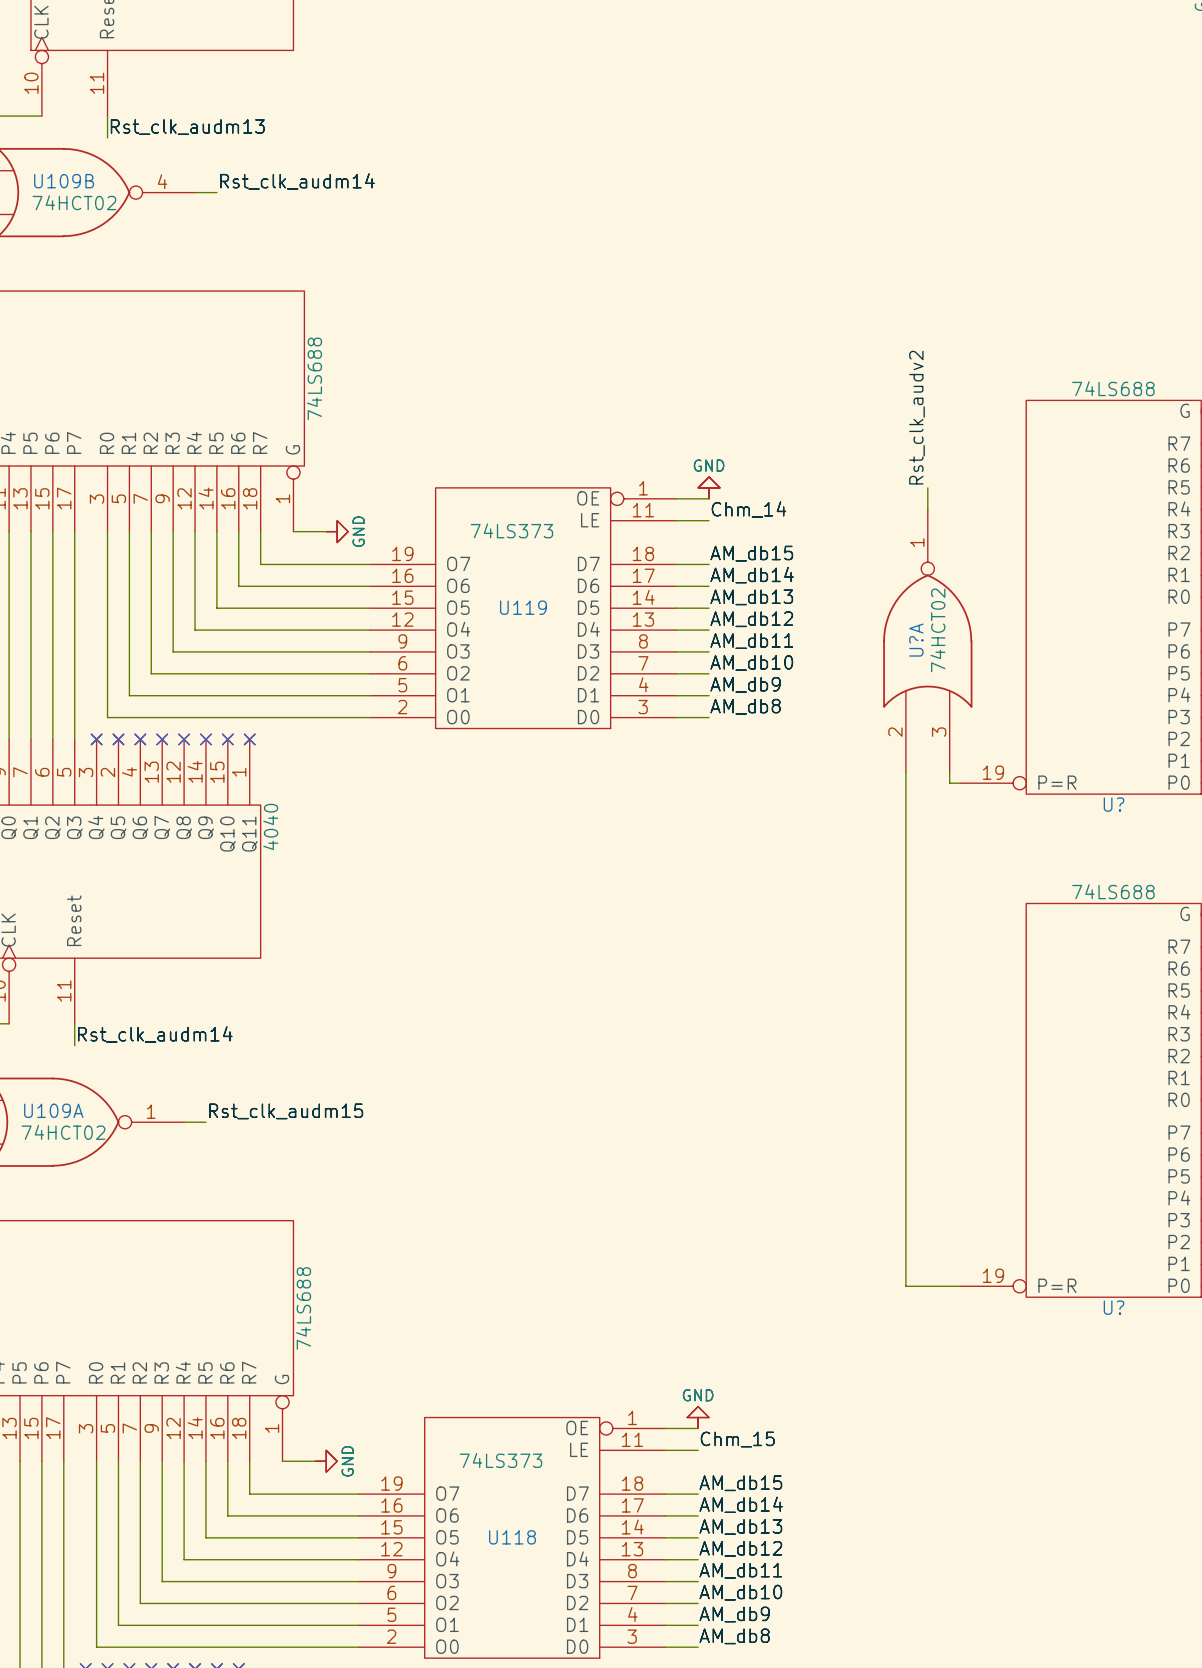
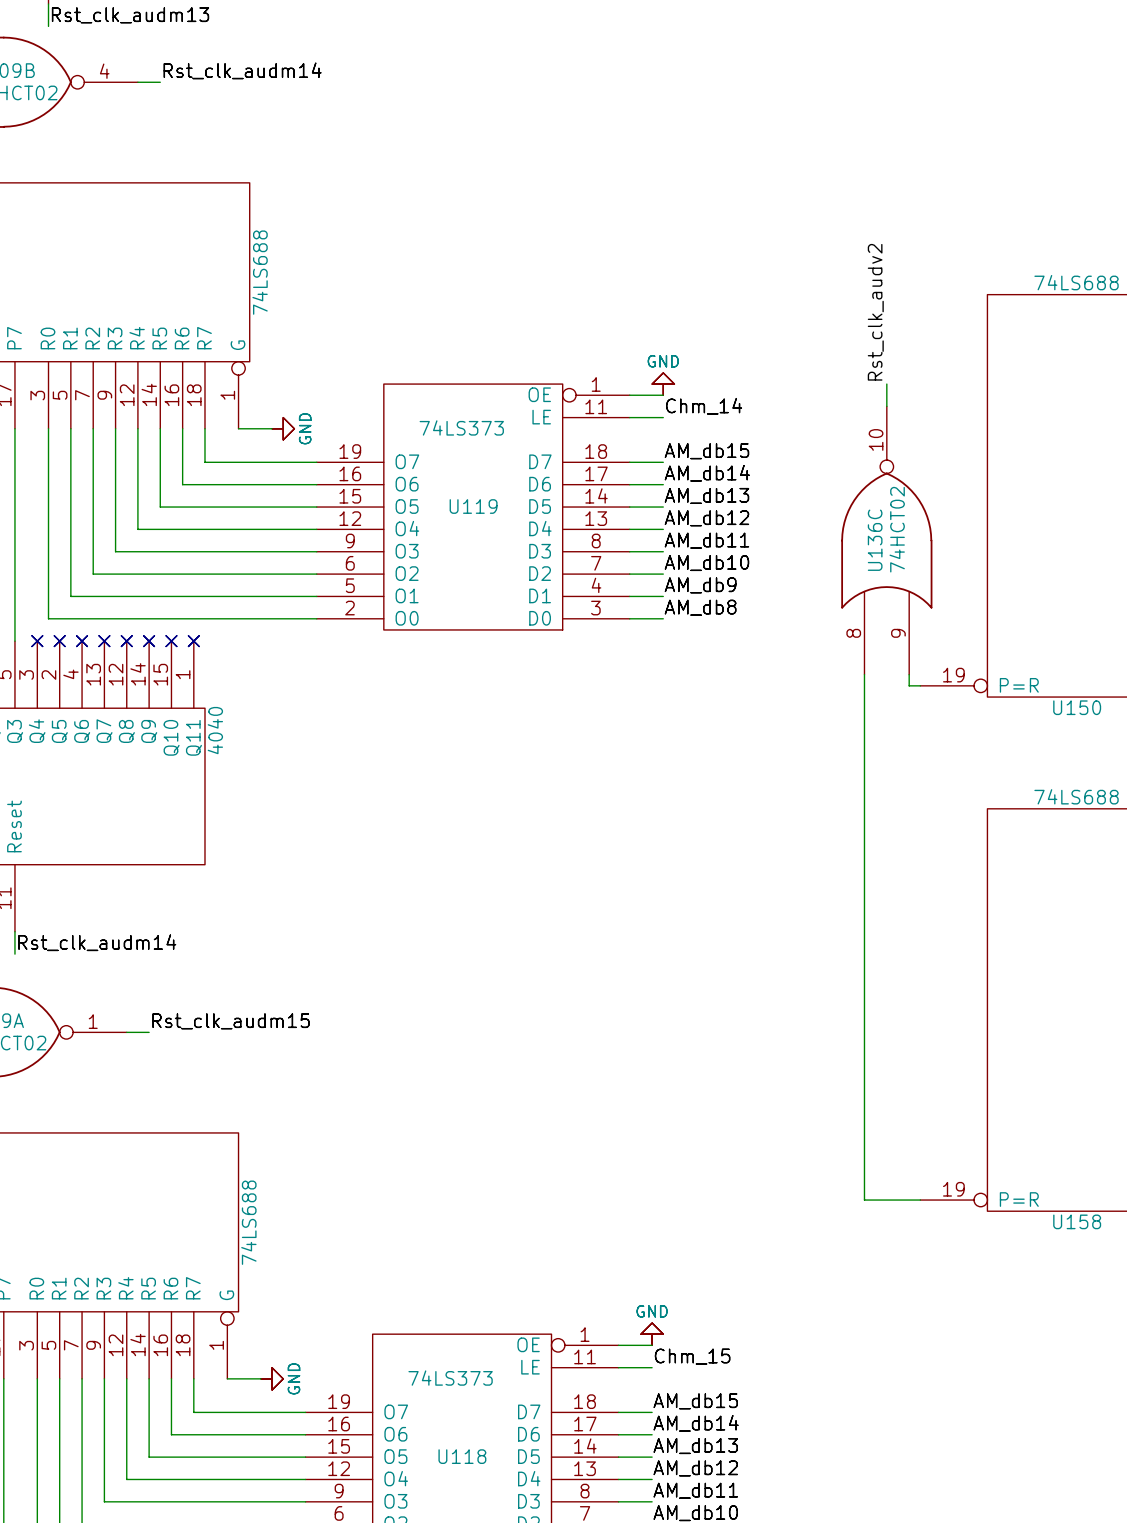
U?A pin number: 1 (917, 542) -> 10 (876, 439)
U?A name: U?A (916, 640) -> U136C (875, 540)
U?A pin number: 2 (895, 732) -> 8 (853, 633)
U?A pin number: 3 (939, 732) -> 9 (898, 633)
U? name: U? (1114, 804) -> U150 (1077, 707)
U? name: U? (1114, 1307) -> U158 (1077, 1221)

